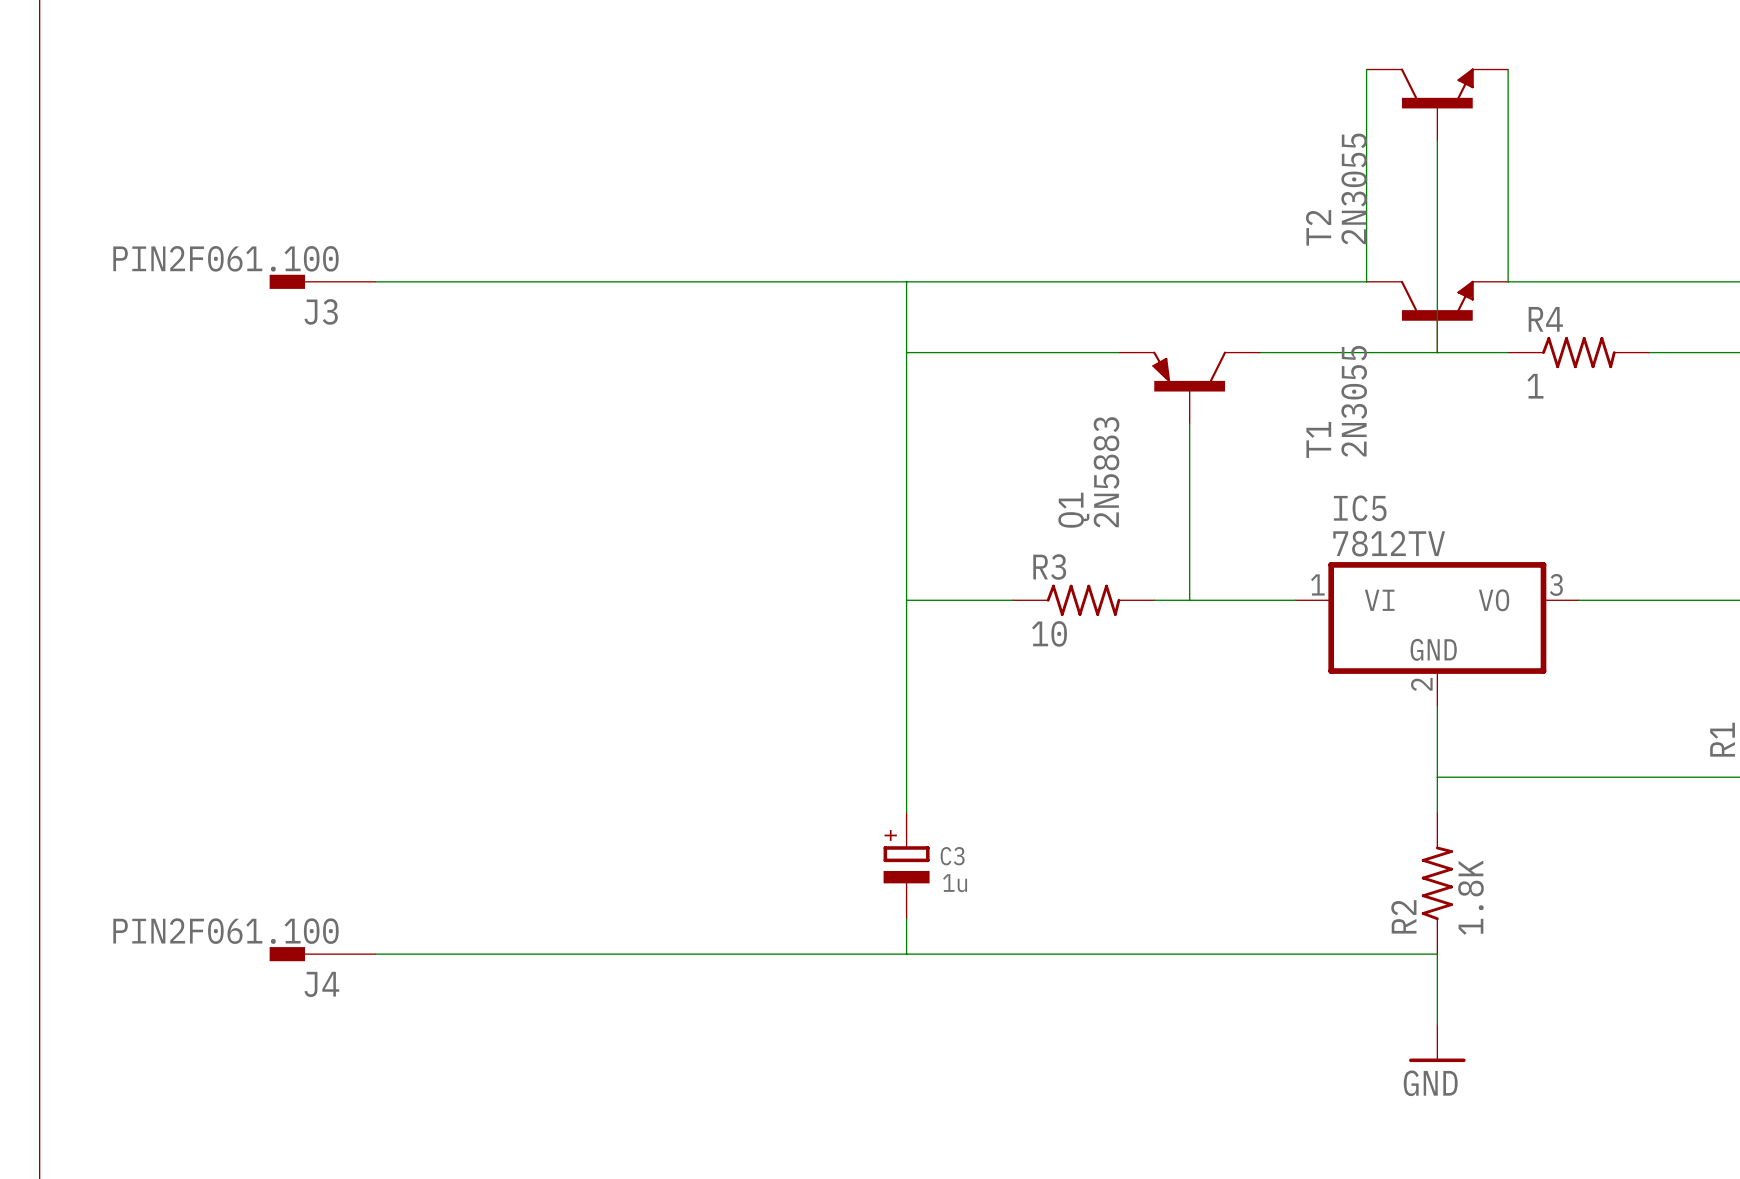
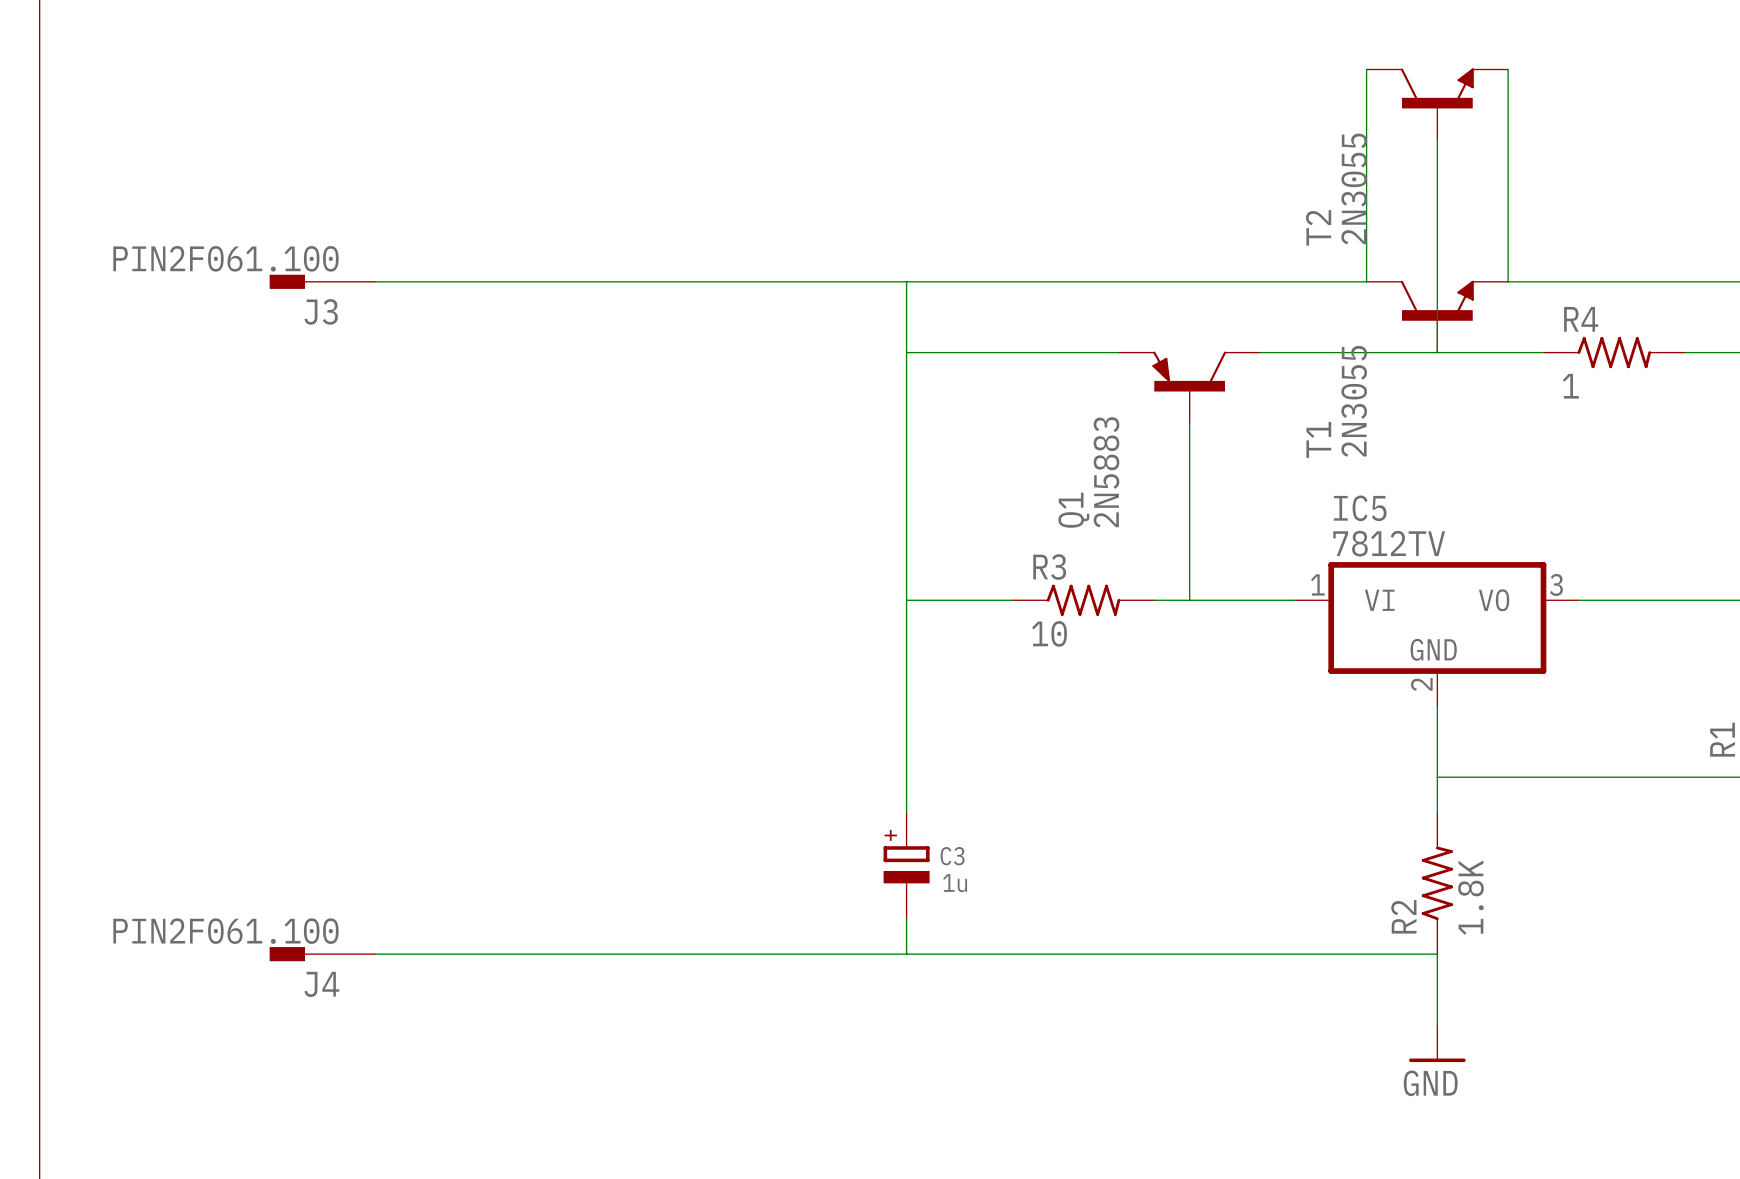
R4 position: (1578, 352) -> (1614, 352)

